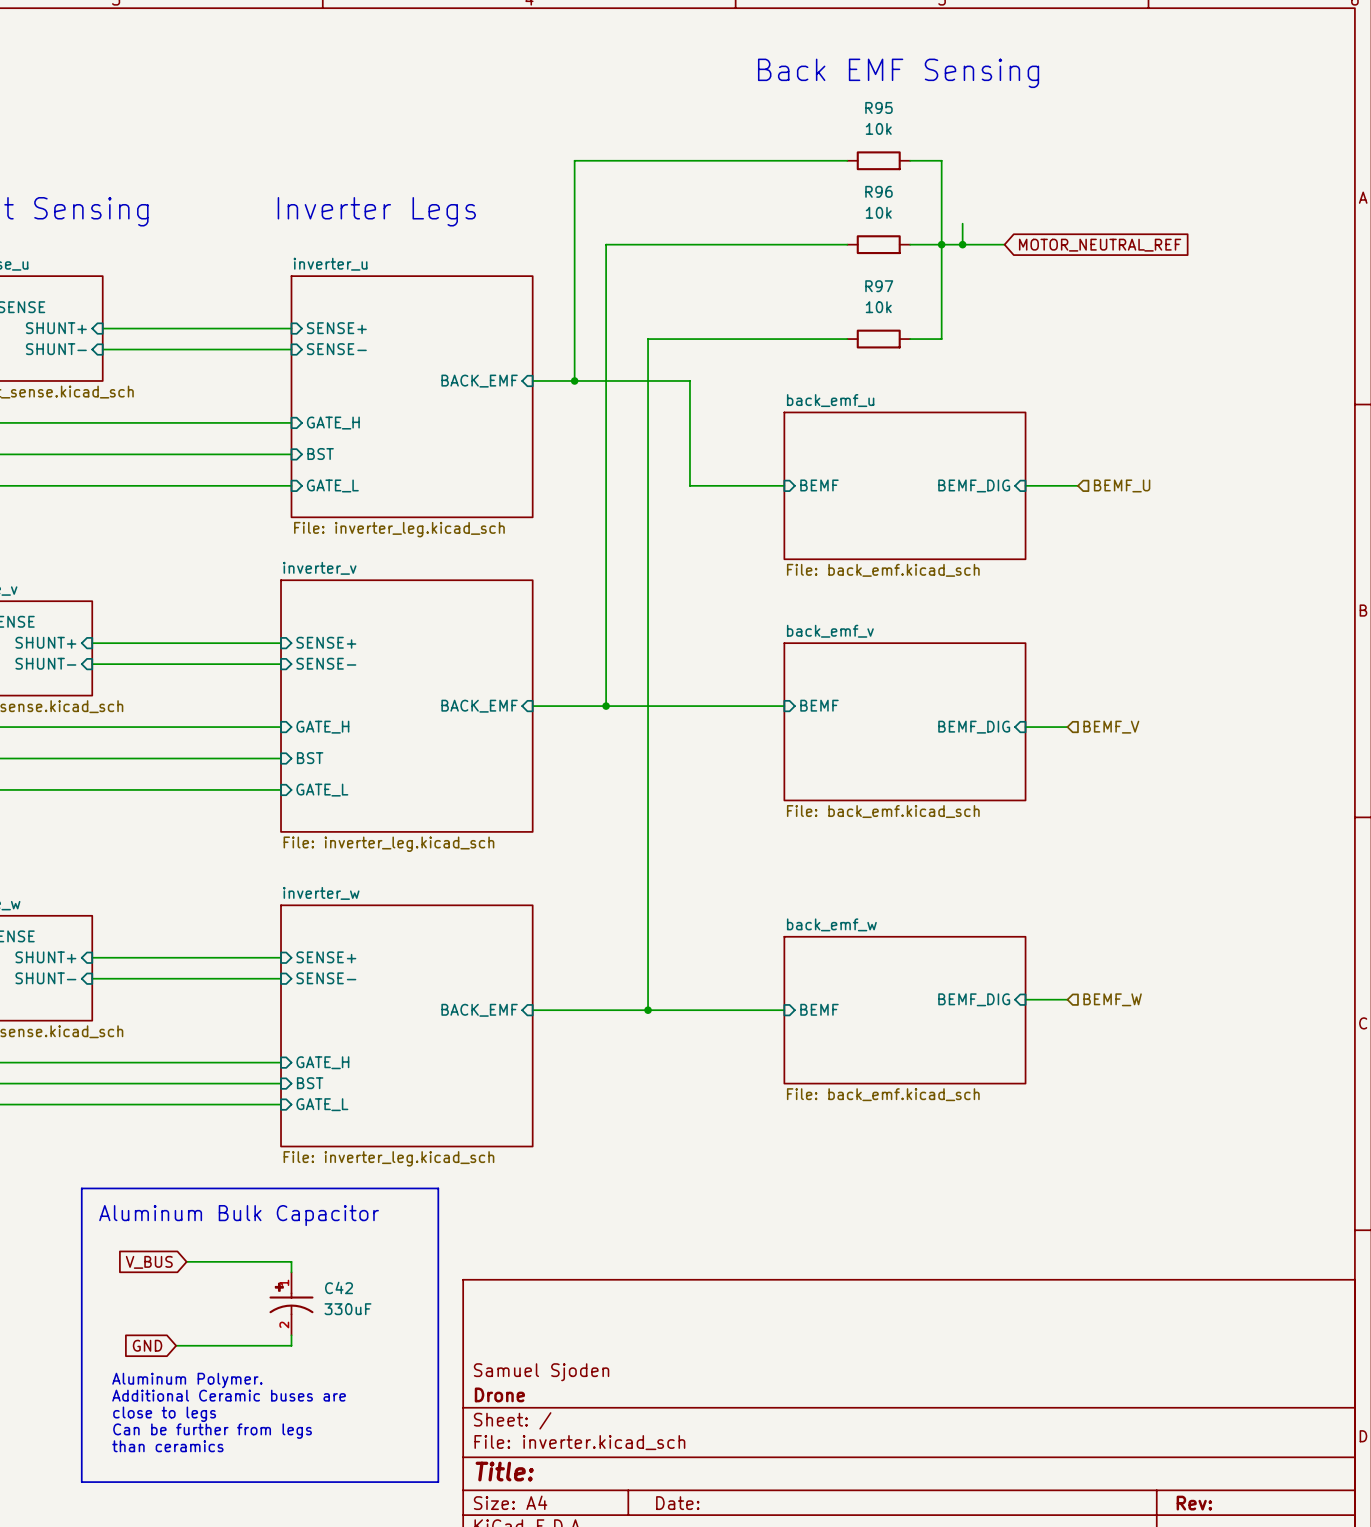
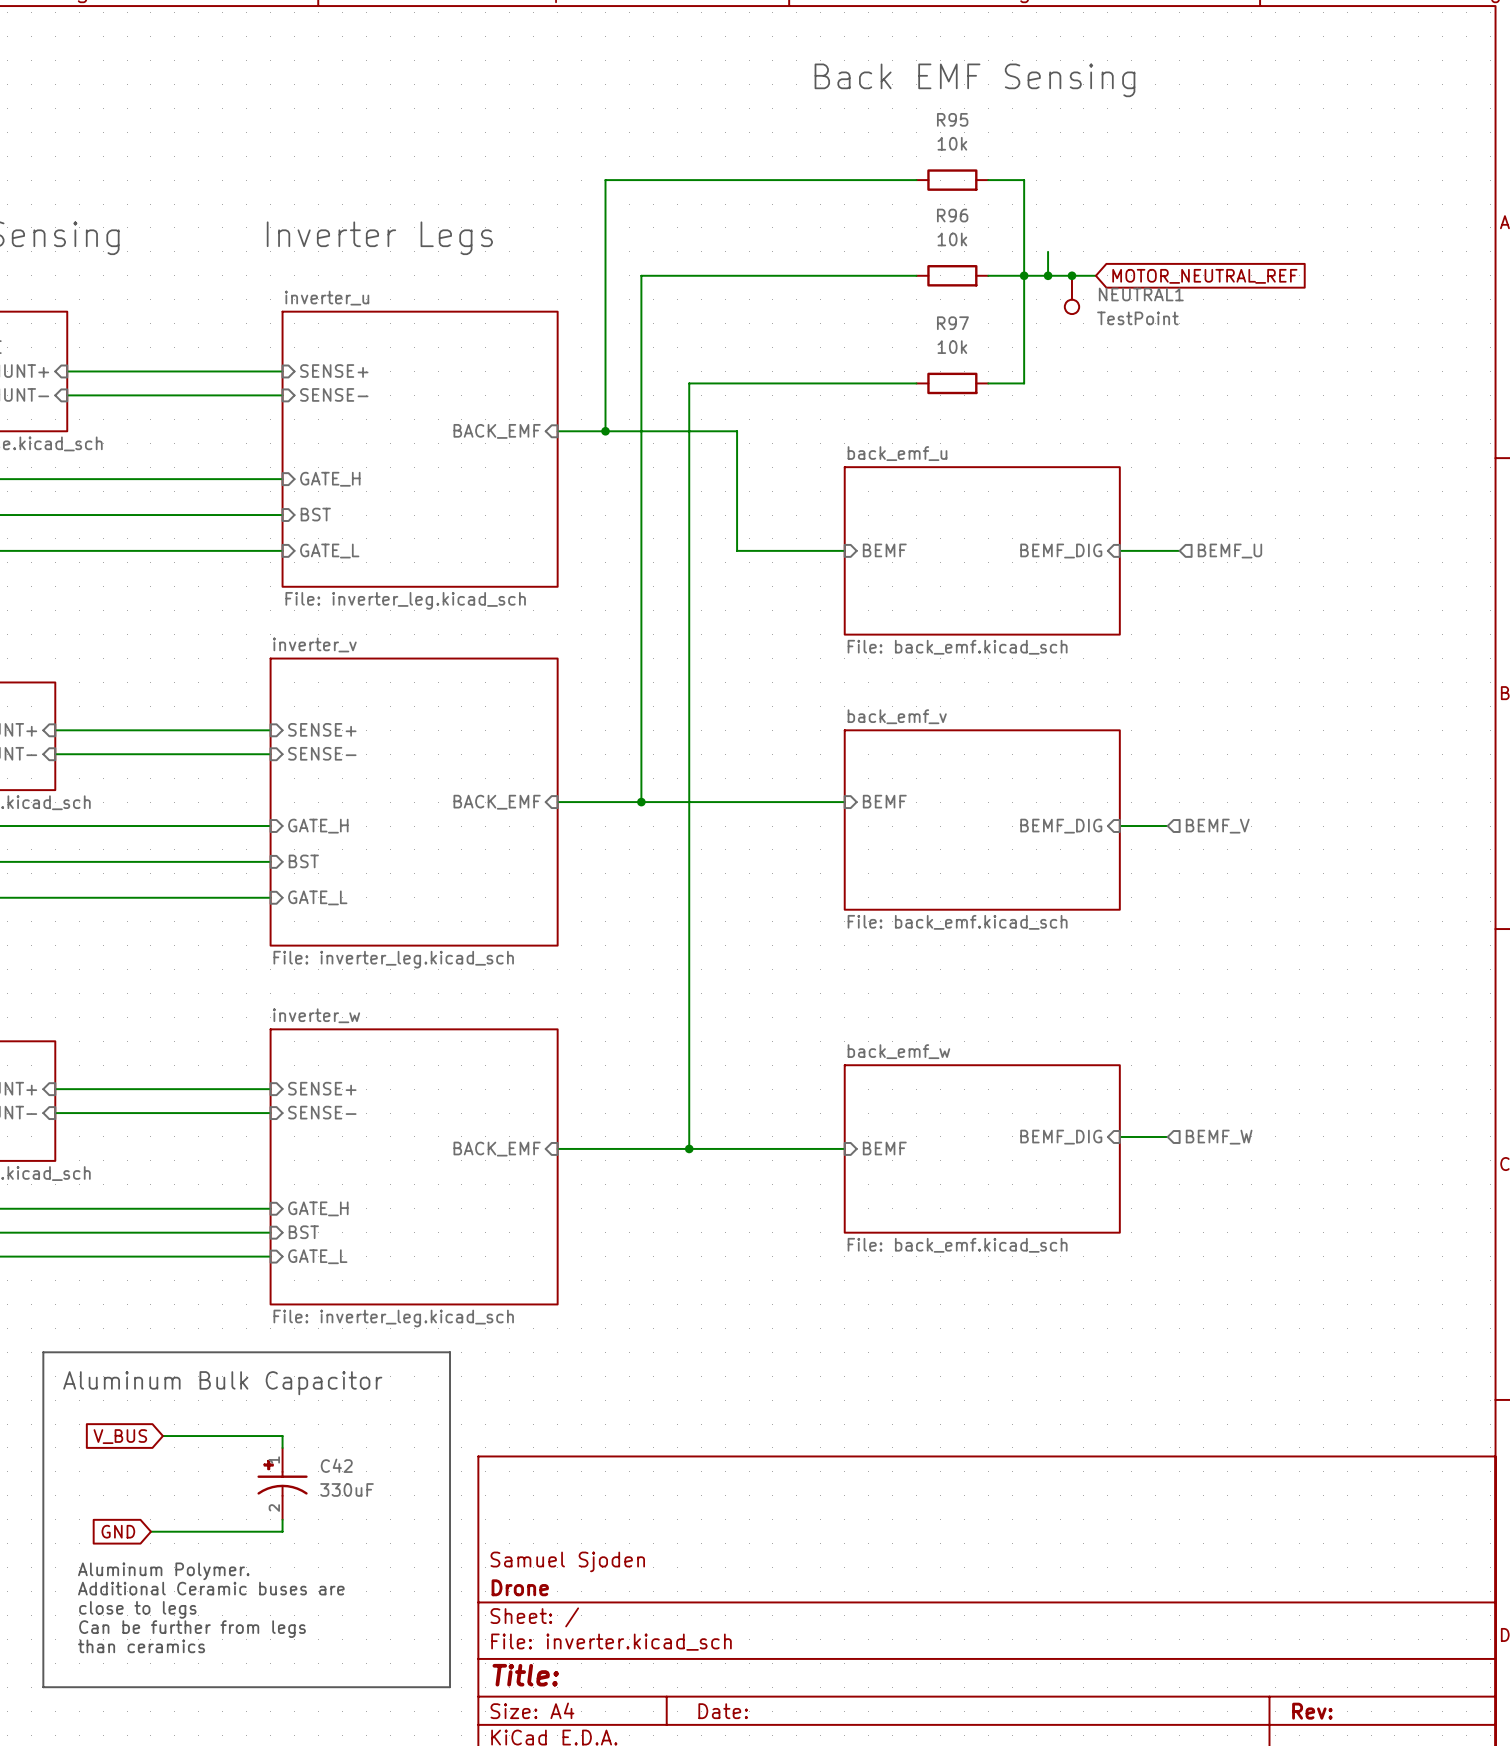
junction: none -> (1071, 275)
NEUTRAL1: none -> TestPoint (1071, 294)

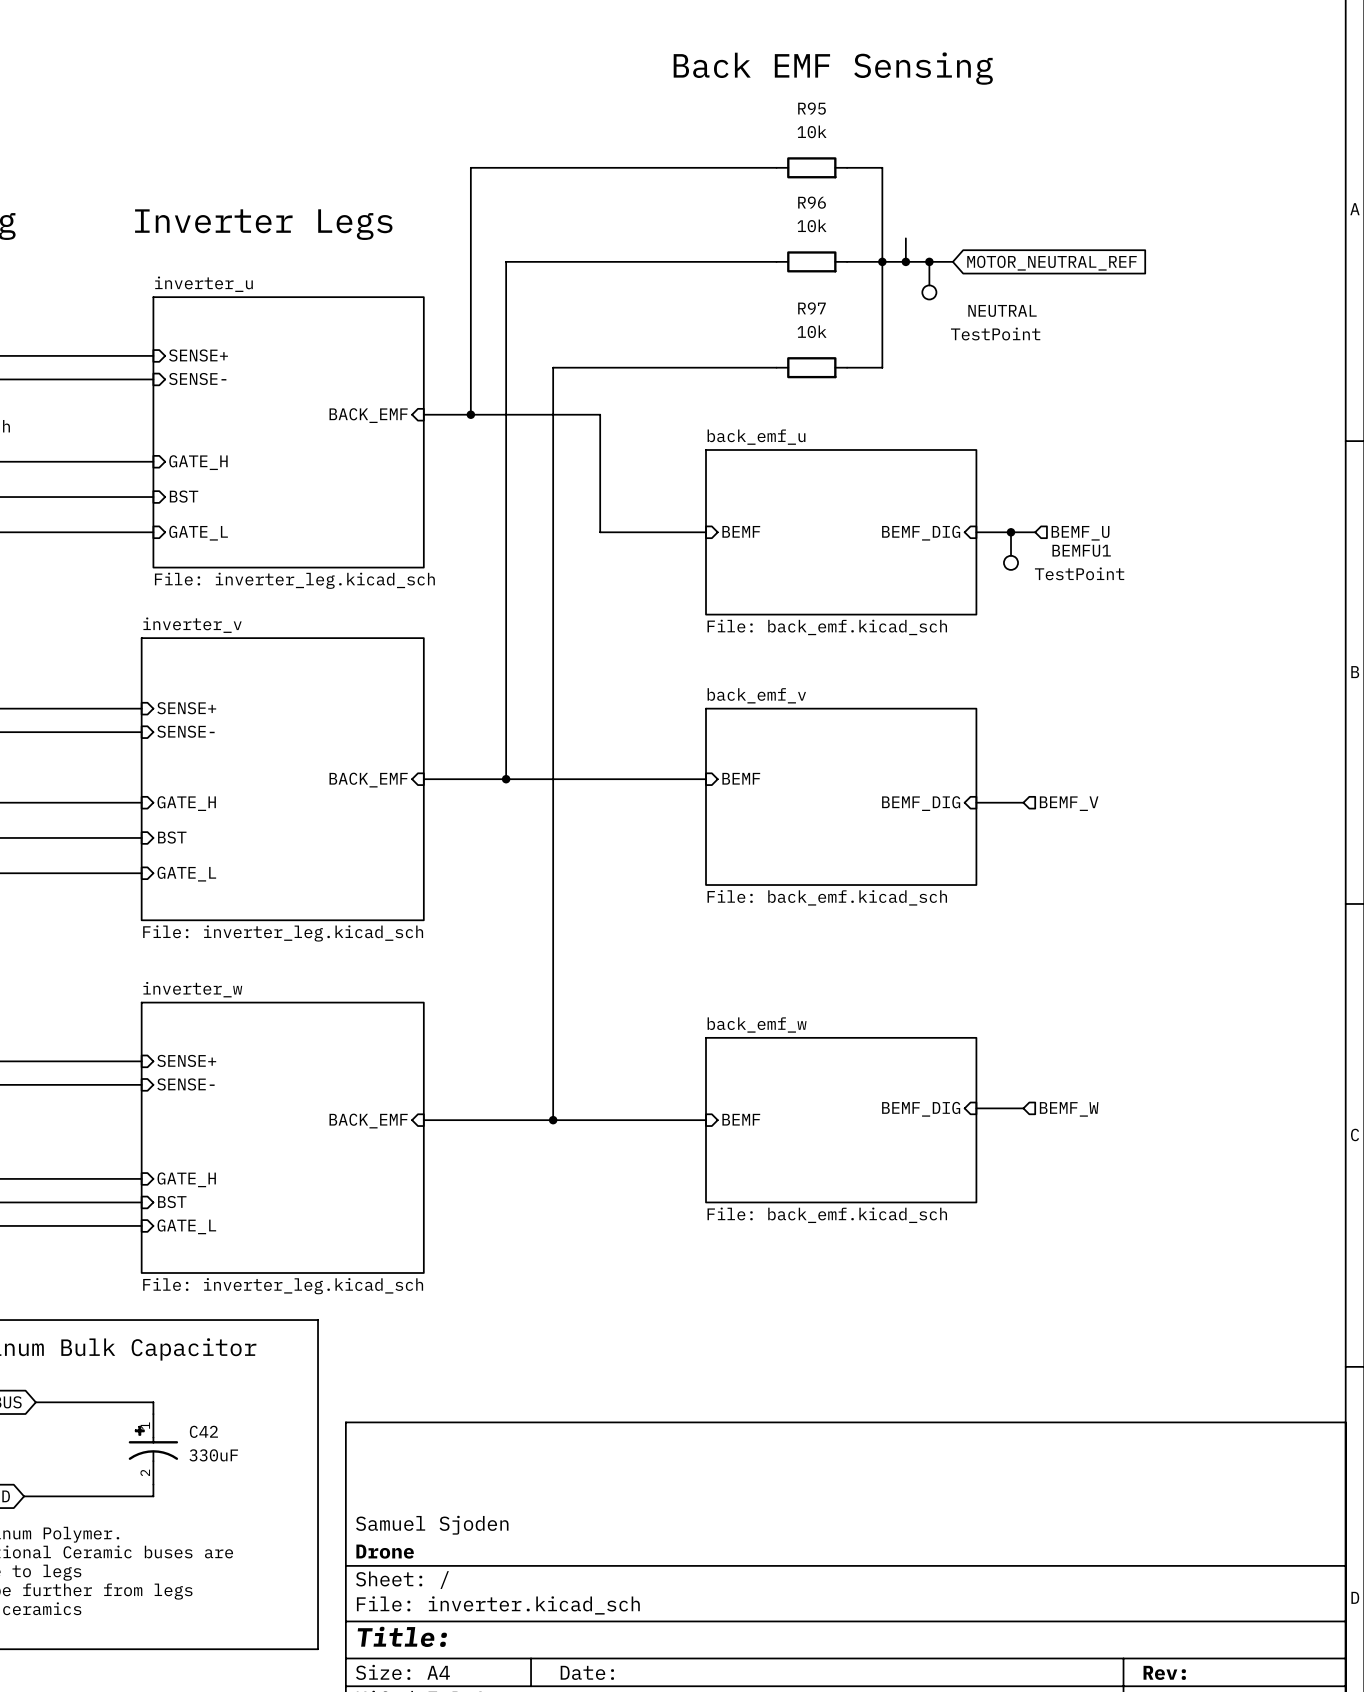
NEUTRAL1 name: NEUTRAL1 (1141, 294) -> NEUTRAL (1002, 310)
NEUTRAL1 value position: TestPoint (1137, 318) -> TestPoint (995, 334)
junction: none -> (1011, 532)
BEMFU1: none -> TestPoint (1011, 551)

